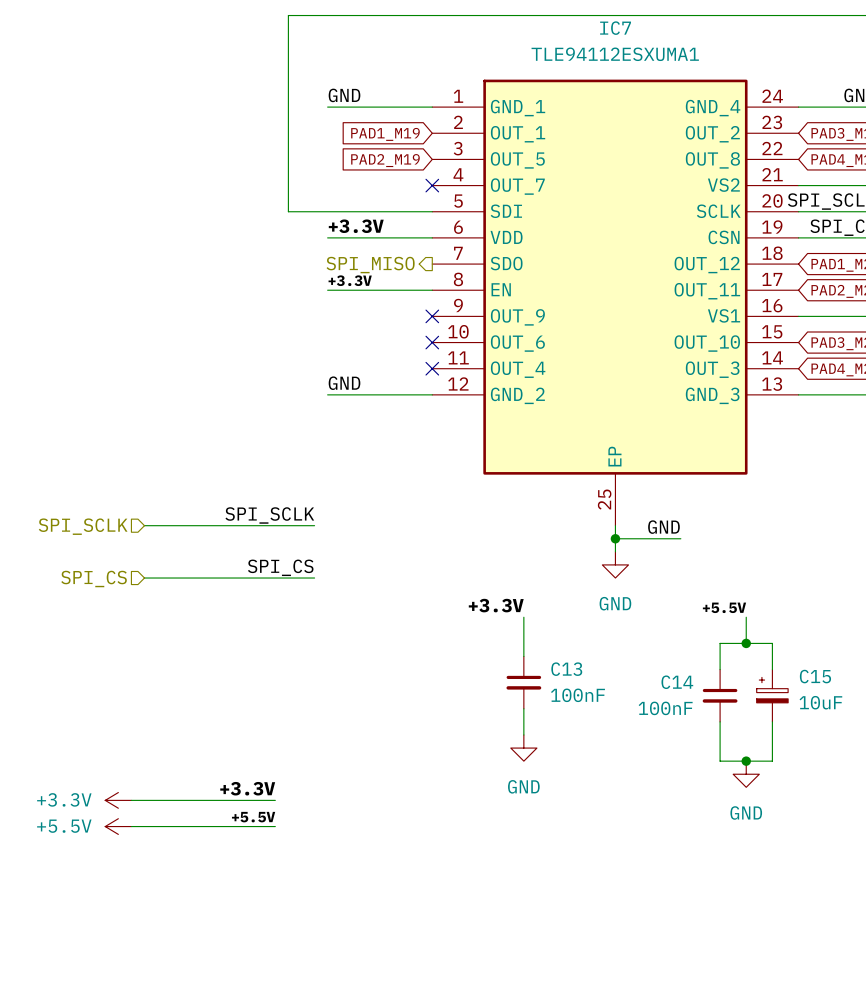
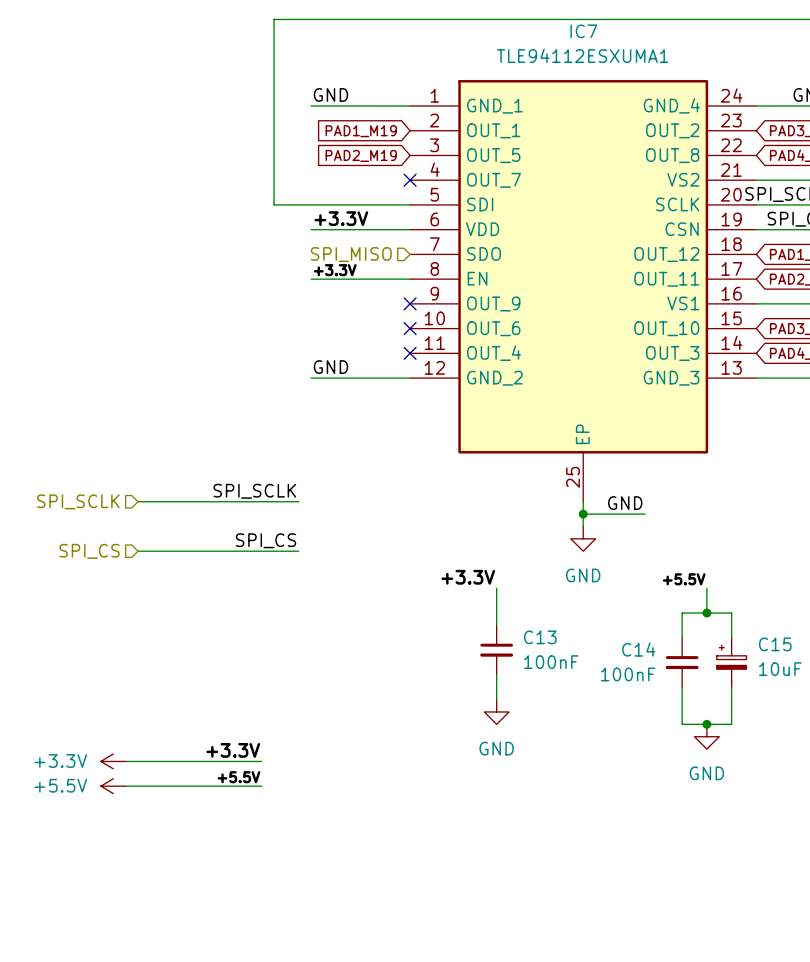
hierarchical label shape: output (370, 265) -> input (351, 254)

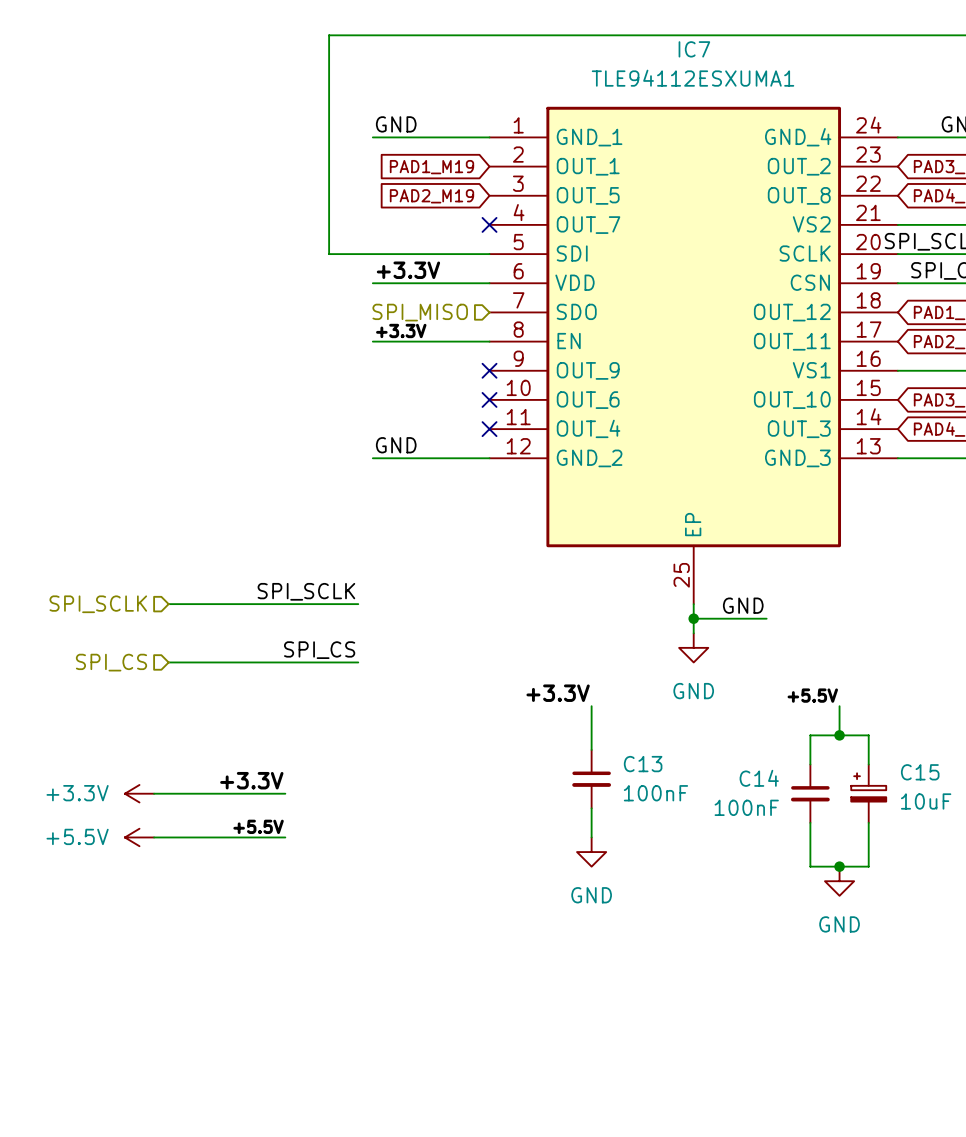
wire: none -> (154, 793) (285, 793)
wire: none -> (154, 837) (285, 837)
label position: +3.3V (233, 750) -> +3.3V (251, 780)
power symbol position: +3.3V (113, 761) -> +3.3V (139, 793)
wire: (125, 761) (261, 761) -> none
label position: +5.5V (238, 777) -> +5.5V (258, 826)
power symbol position: +5.5V (113, 786) -> +5.5V (139, 837)
wire: (125, 786) (261, 786) -> none

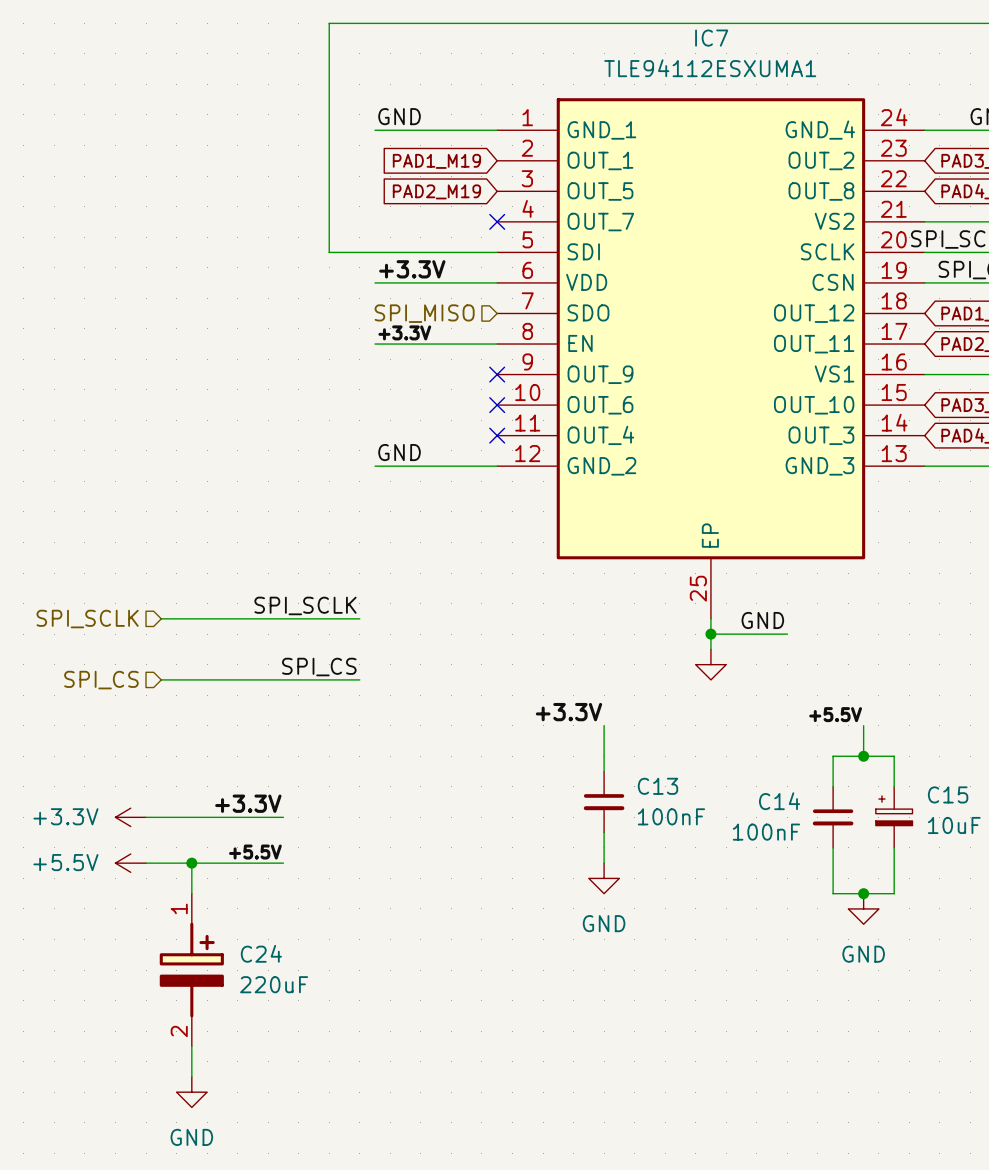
power symbol text: GND (693, 691) -> none
wire: none -> (191, 863) (191, 893)
junction: none -> (191, 863)
C24: none -> 220uF (191, 970)
wire: none -> (191, 1046) (191, 1076)
power symbol: none -> GND (191, 1092)

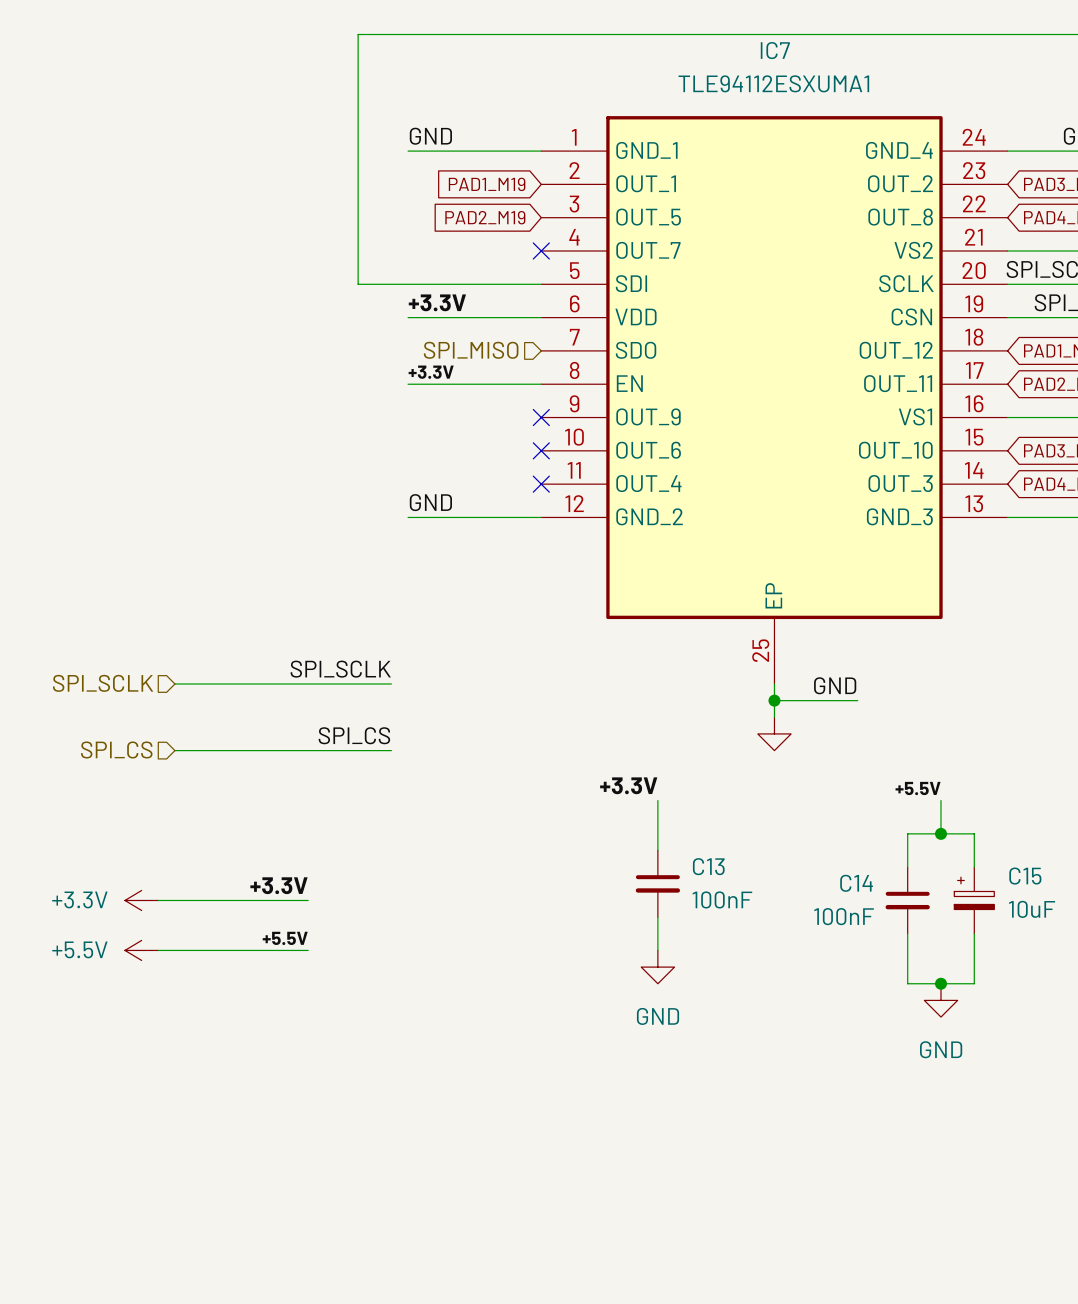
wire: (191, 863) (191, 893) -> none
junction: (191, 863) -> none
C24: 220uF (191, 970) -> none
wire: (191, 1046) (191, 1076) -> none
power symbol: GND (191, 1092) -> none

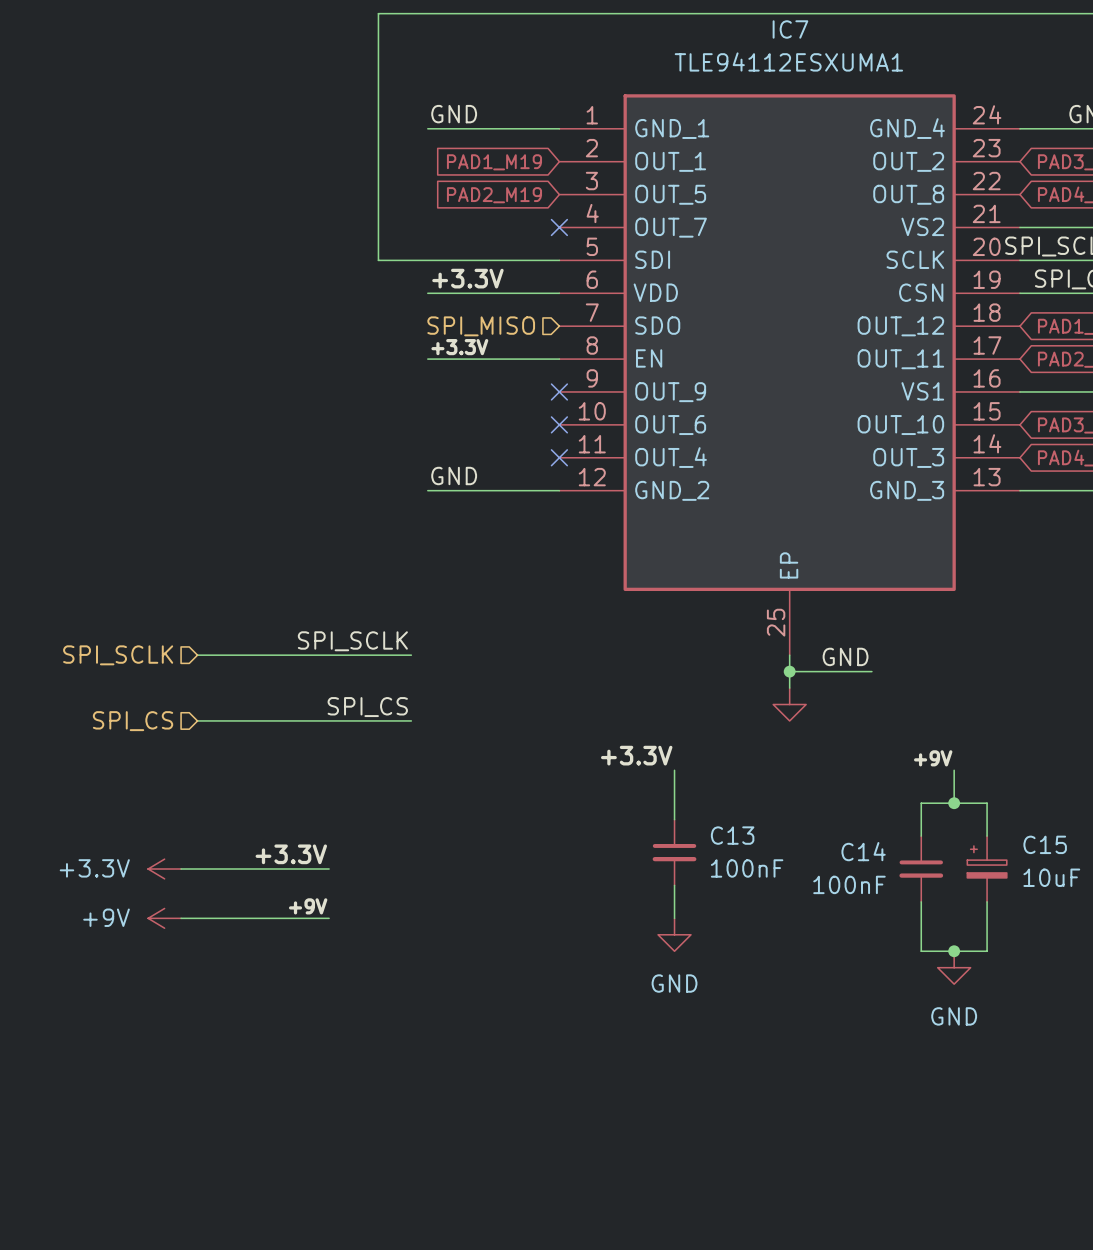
label: +5.5V (918, 788) -> +9V (933, 758)
label: +5.5V (285, 938) -> +9V (308, 906)
power symbol: +5.5V (141, 950) -> +9V (164, 918)

